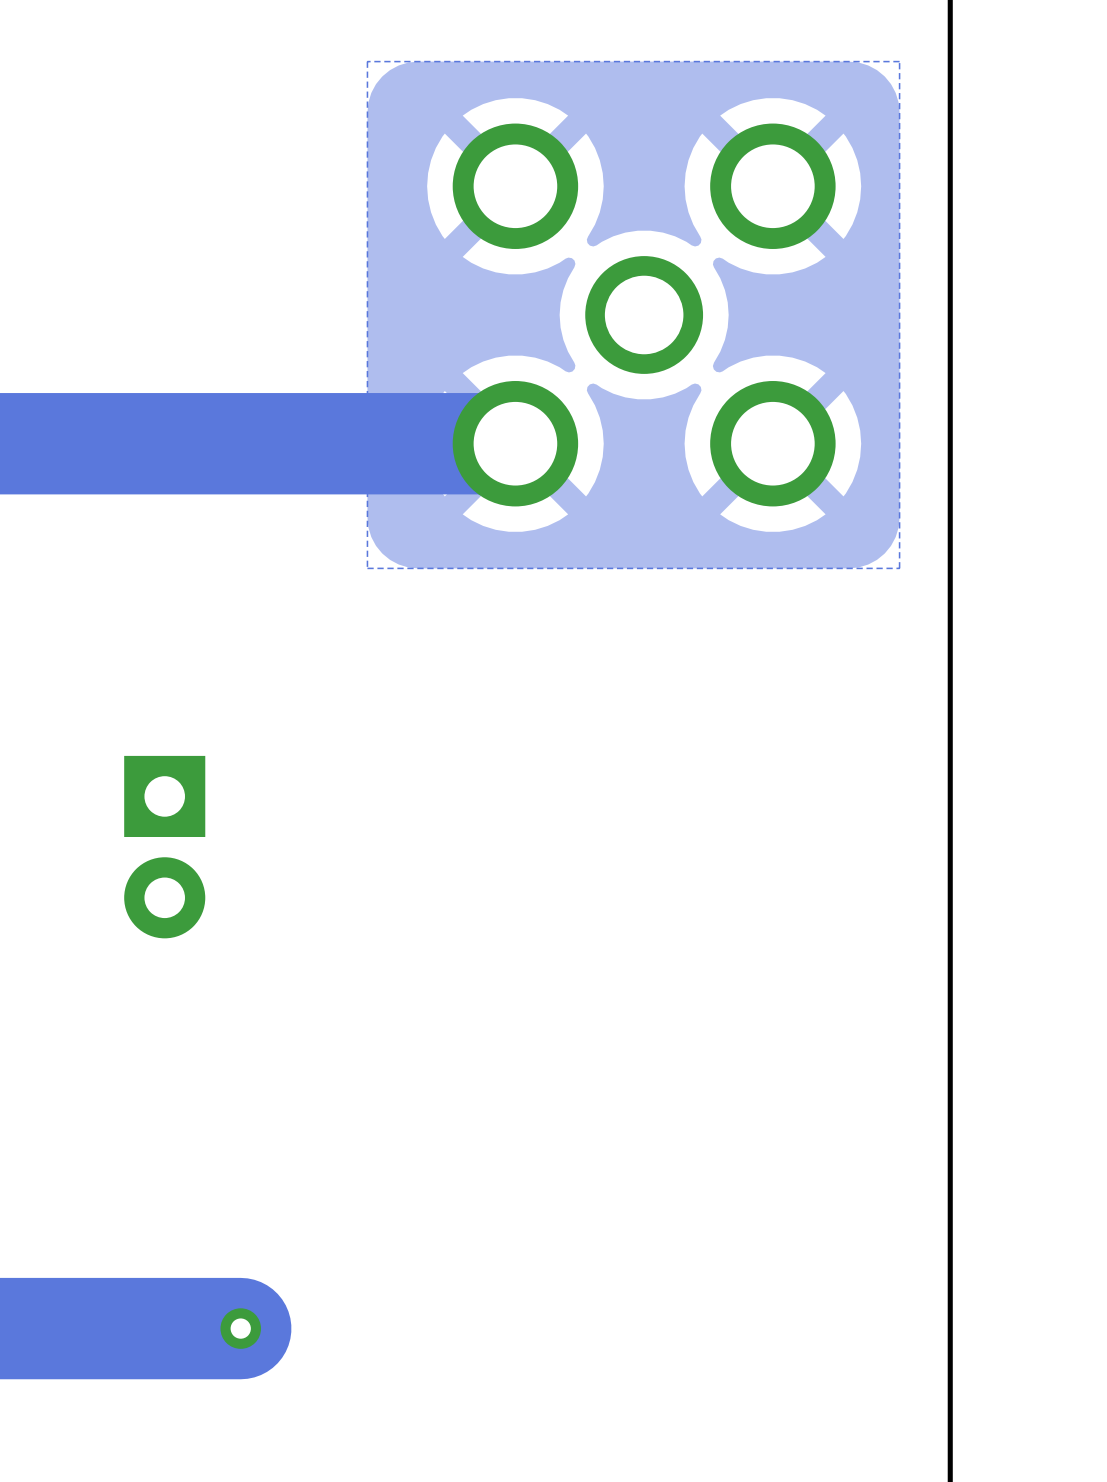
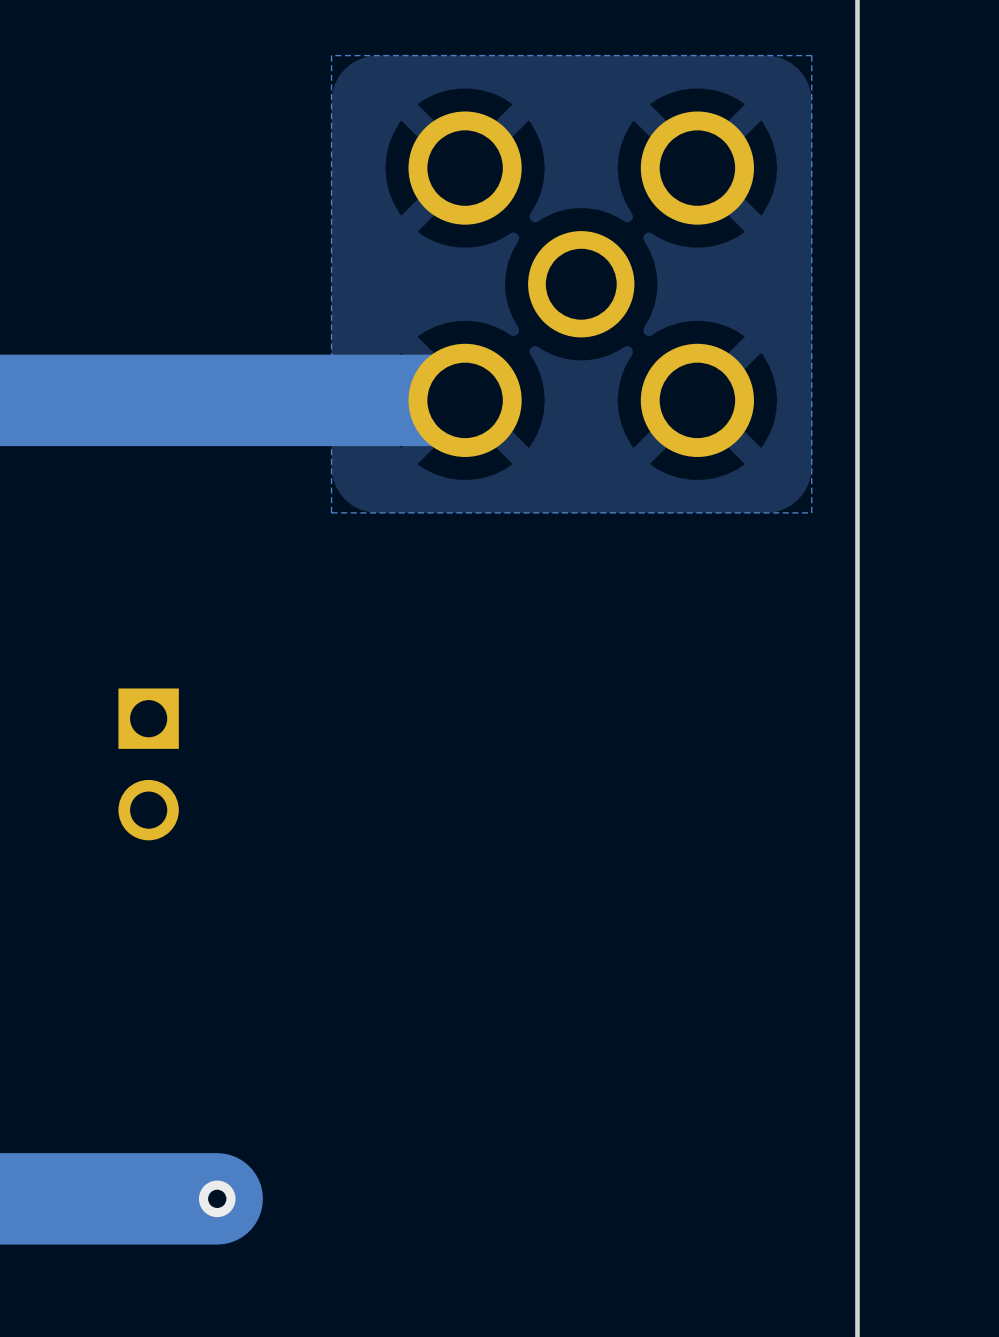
part footprint: [124, 755, 206, 939] -> [118, 688, 179, 841]

